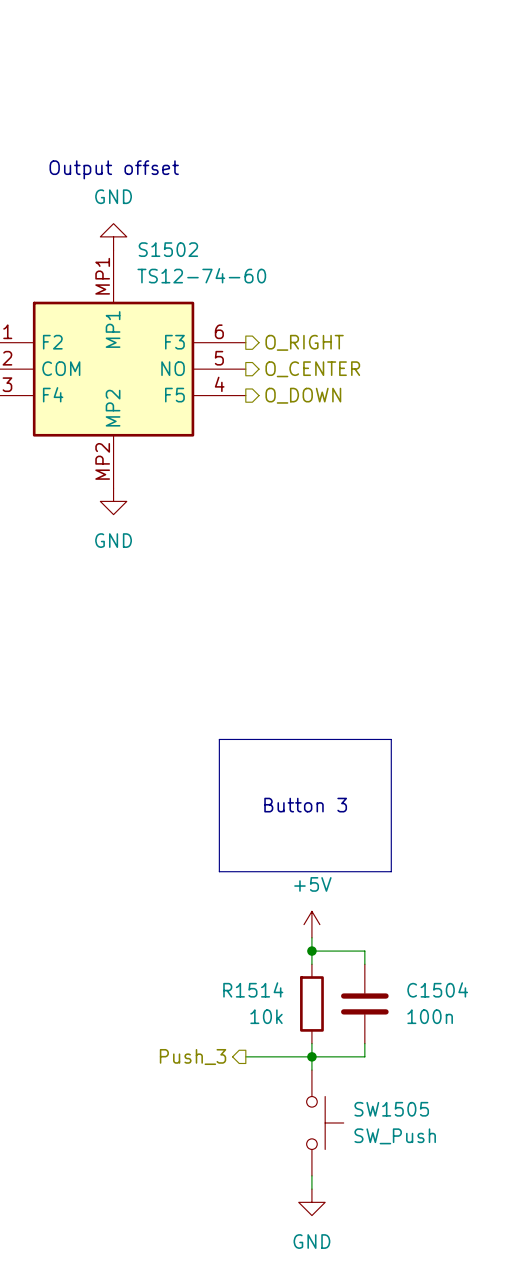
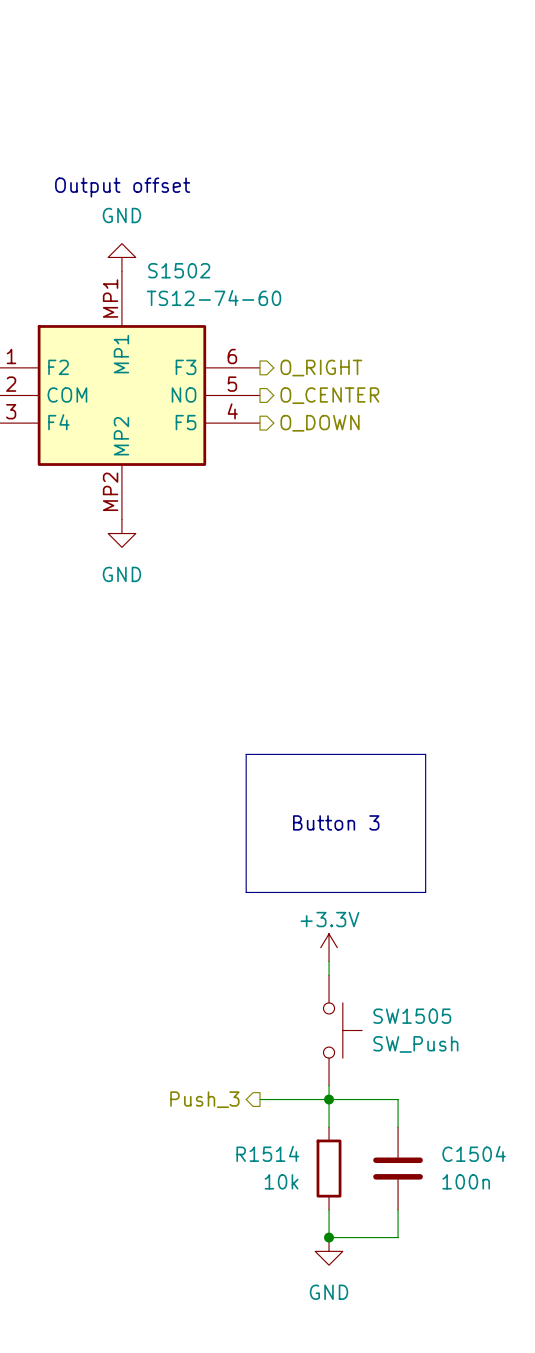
line: (219, 739) (391, 739) (391, 871) (219, 871) (219, 739) -> (246, 754) (425, 754) (425, 892) (246, 892) (246, 754)
text position: Button 3 (305, 805) -> Button 3 (336, 822)
power symbol: none -> +3.3V (329, 947)
power symbol: +5V (311, 924) -> none
wire: (311, 951) (364, 951) (364, 964) -> none
junction: (311, 951) -> none
R1514 position: (311, 1003) -> (329, 1168)
C1504 position: (364, 1003) -> (398, 1168)
wire: none -> (259, 1099) (398, 1099) (398, 1127)
wire: (364, 1043) (364, 1056) (245, 1056) -> none
junction position: (311, 1056) -> (329, 1099)
hierarchical label position: Push_3 (193, 1057) -> Push_3 (204, 1099)
SW1505 position: (325, 1122) -> (342, 1030)
wire: none -> (329, 1209) (329, 1237) (398, 1237) (398, 1209)
junction: none -> (329, 1237)
power symbol position: GND (311, 1202) -> GND (329, 1251)

